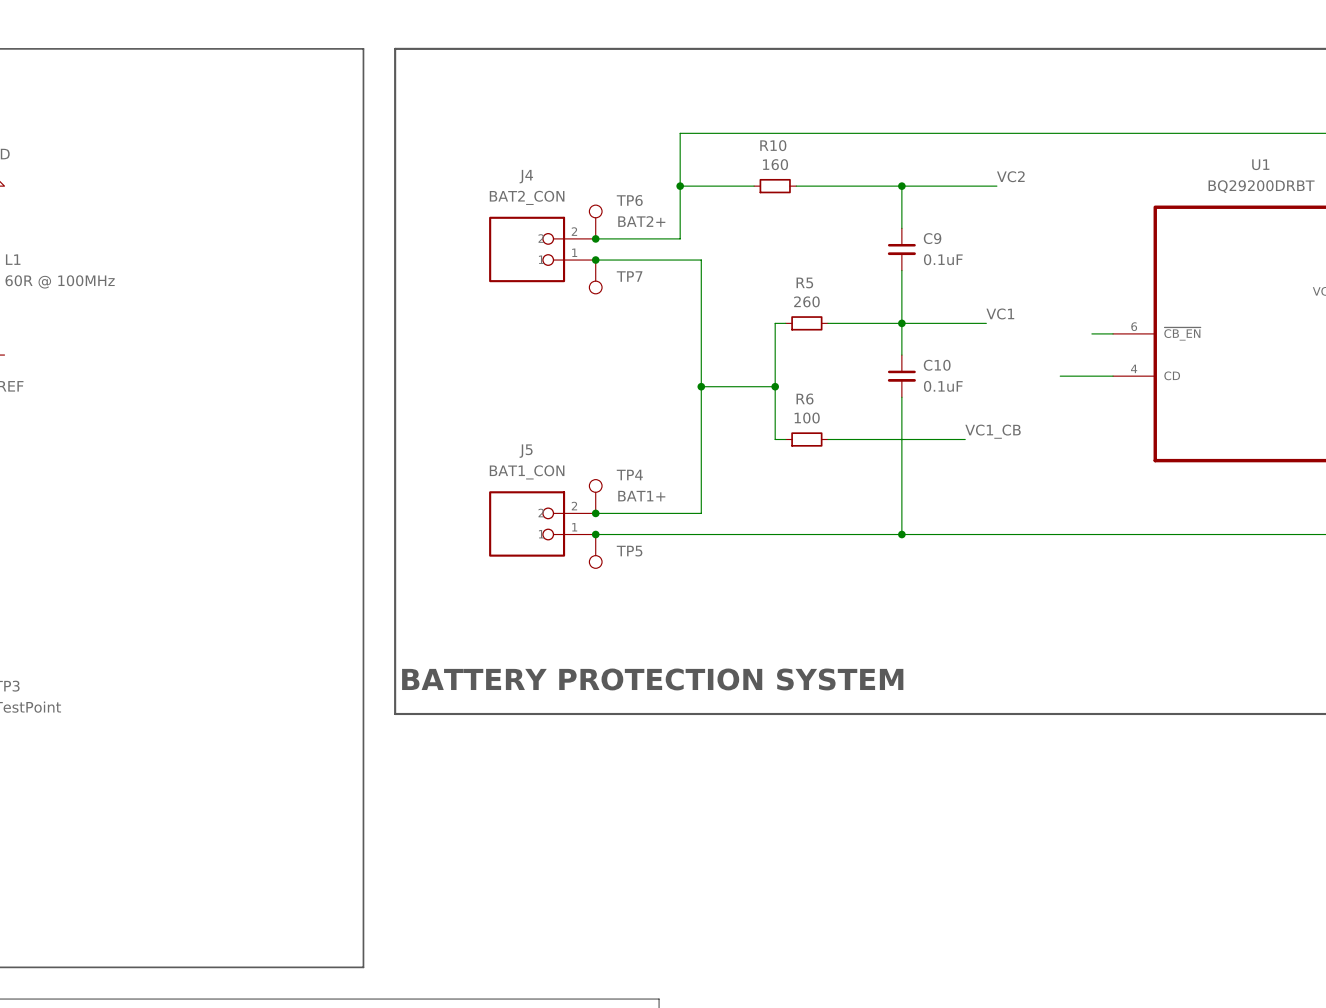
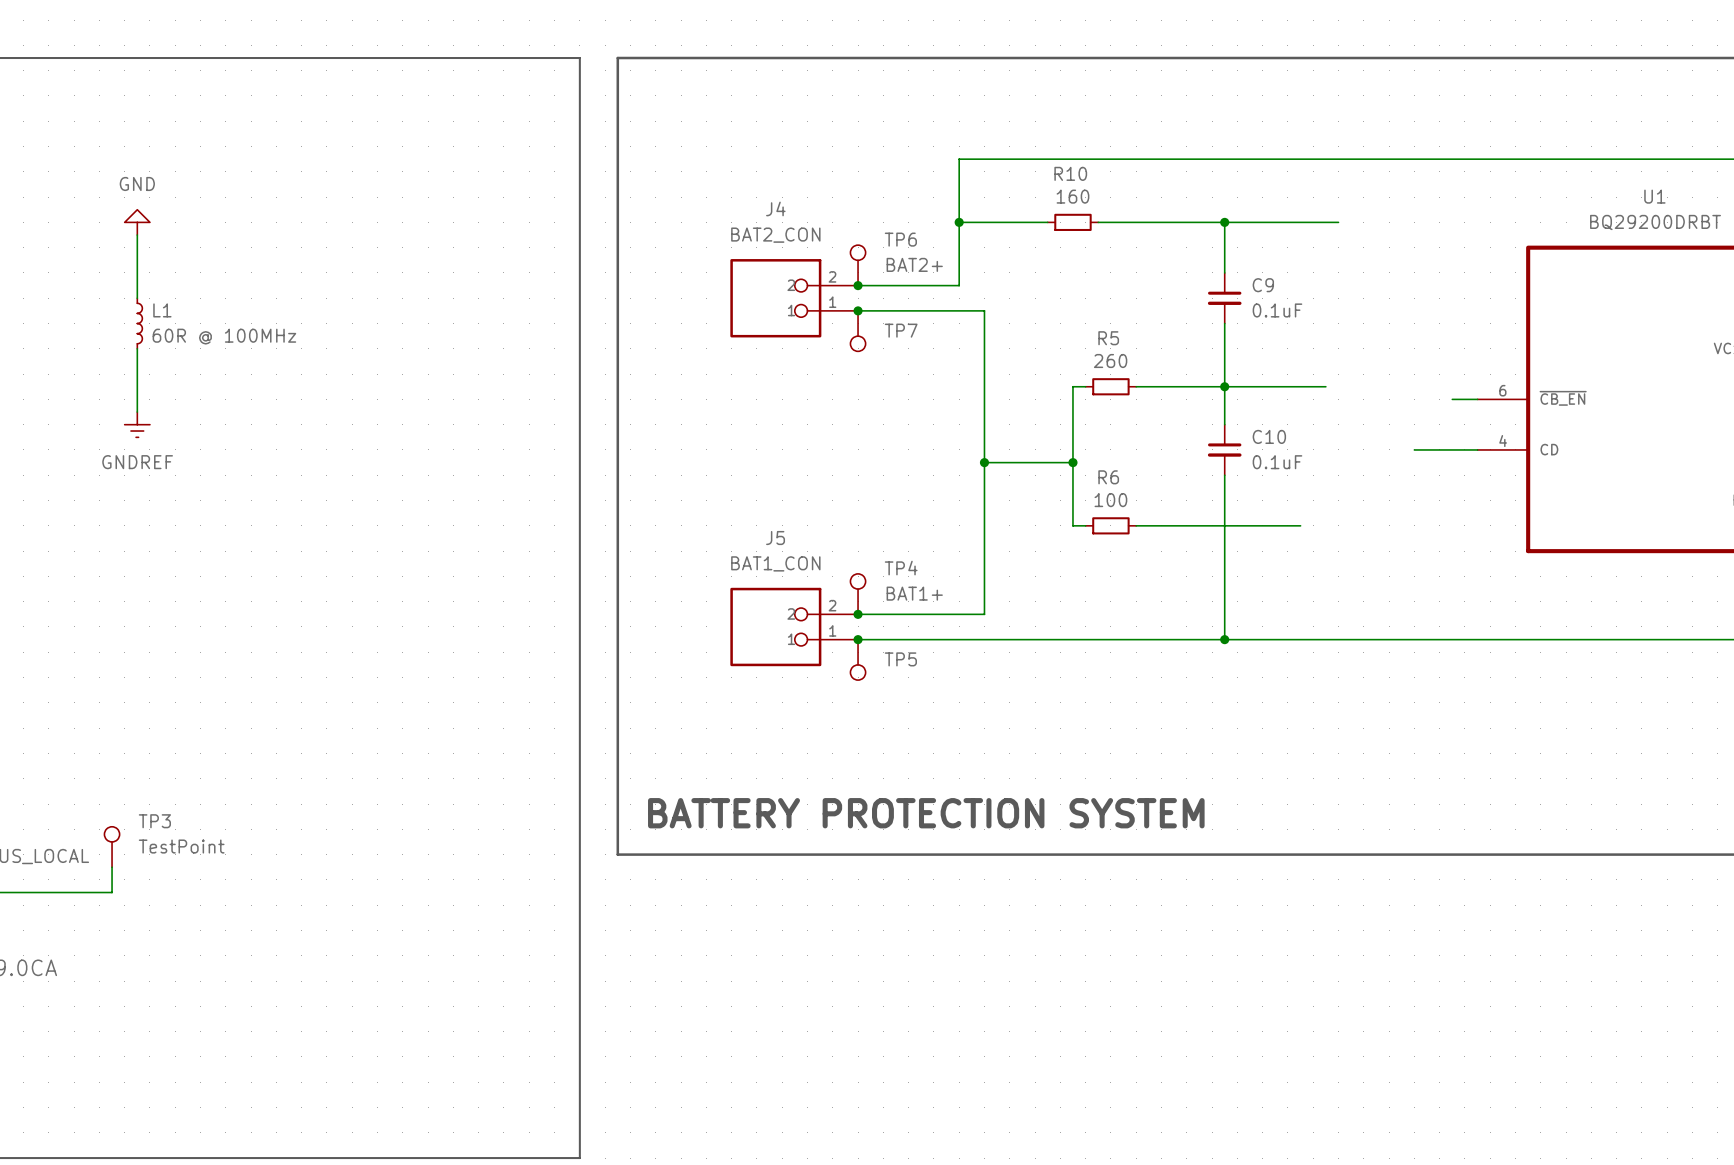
label: VC2 (1010, 176) -> none
label: VC1 (1000, 313) -> none
label: VC1_CB (993, 431) -> none

